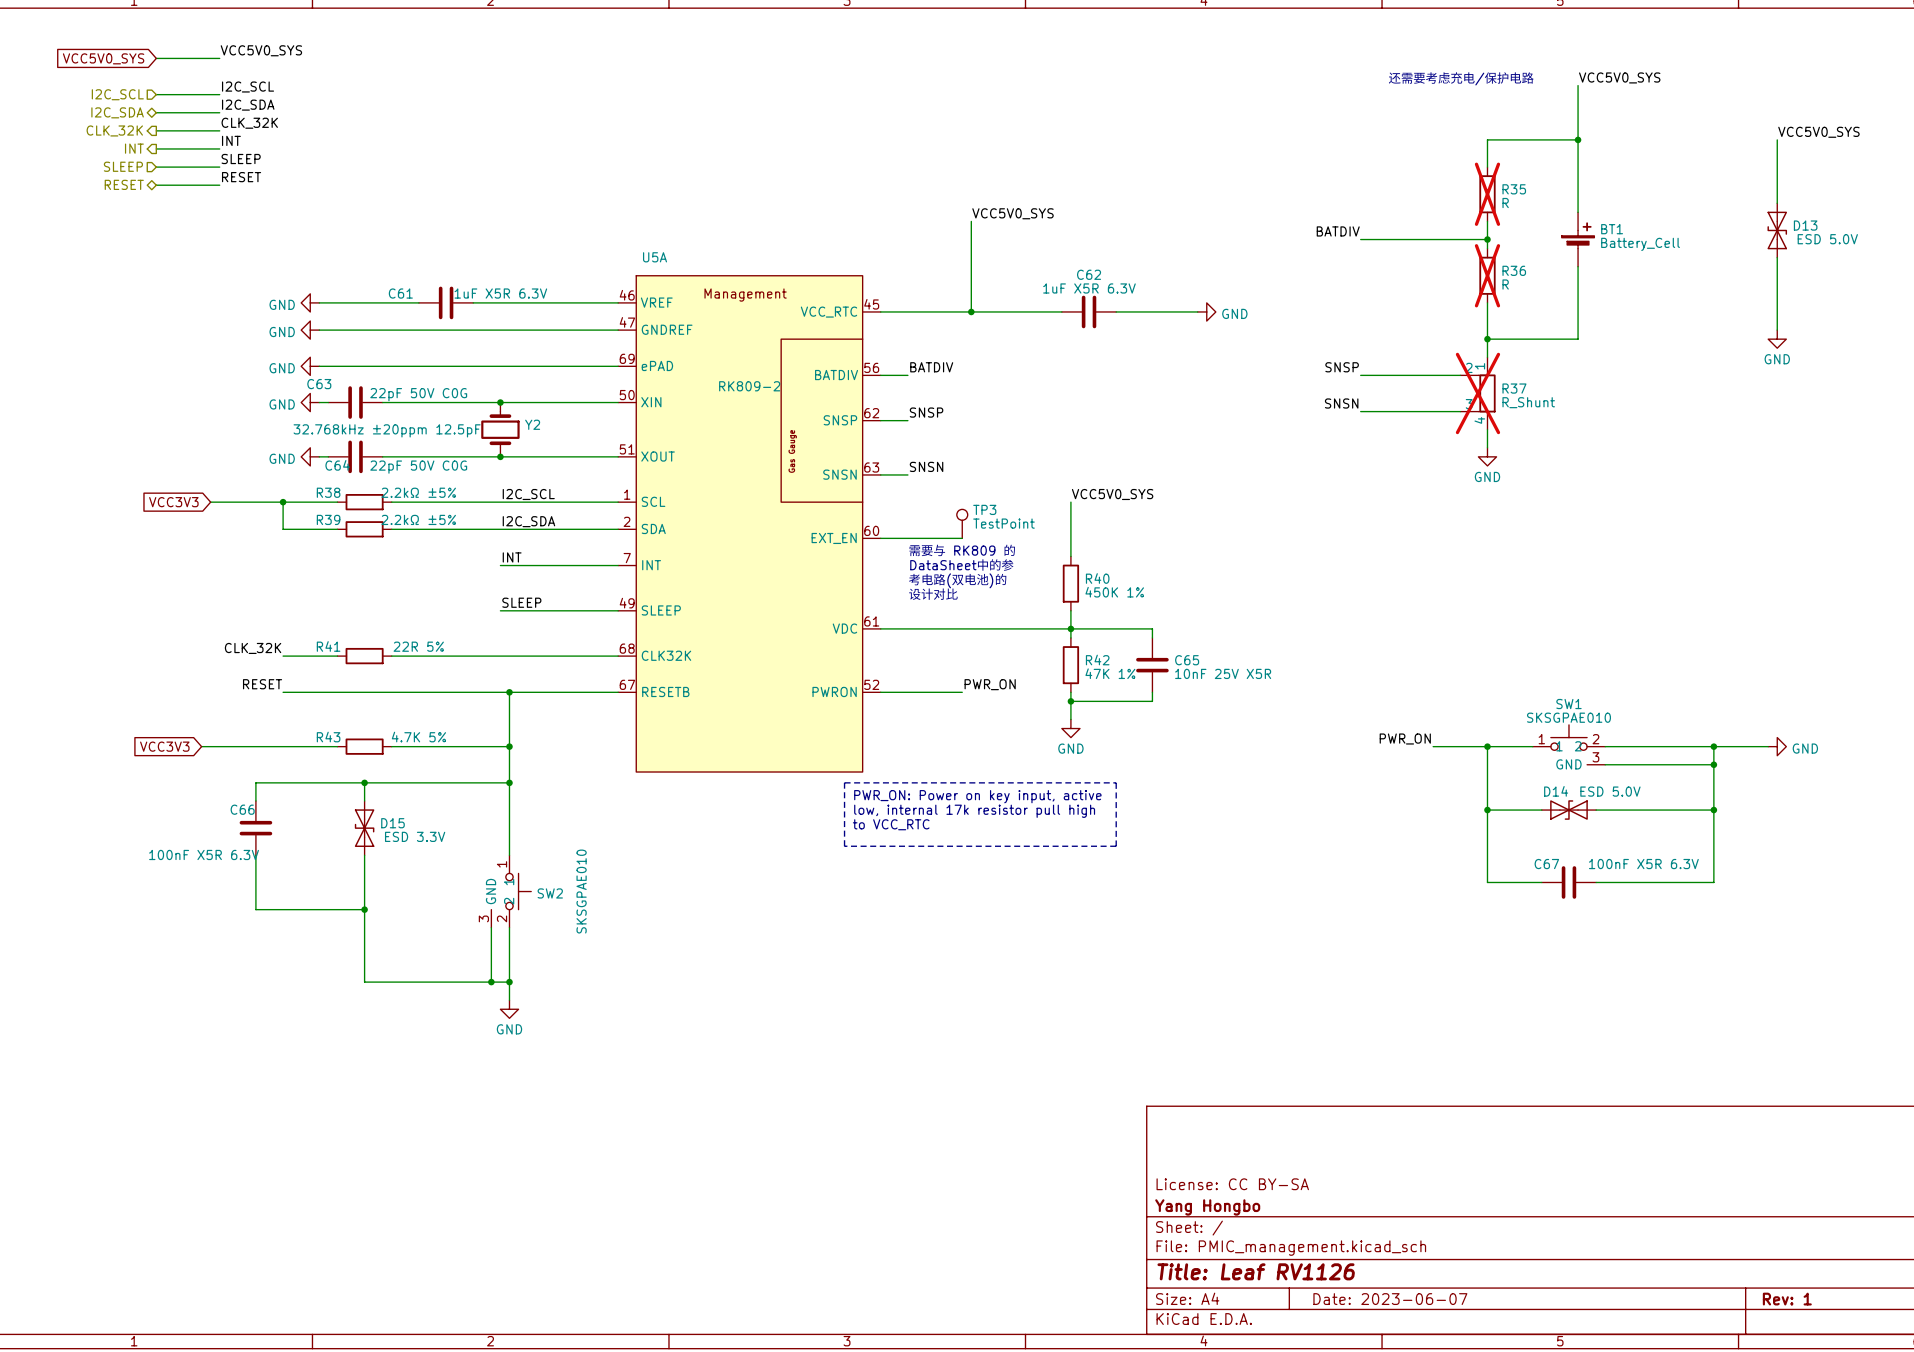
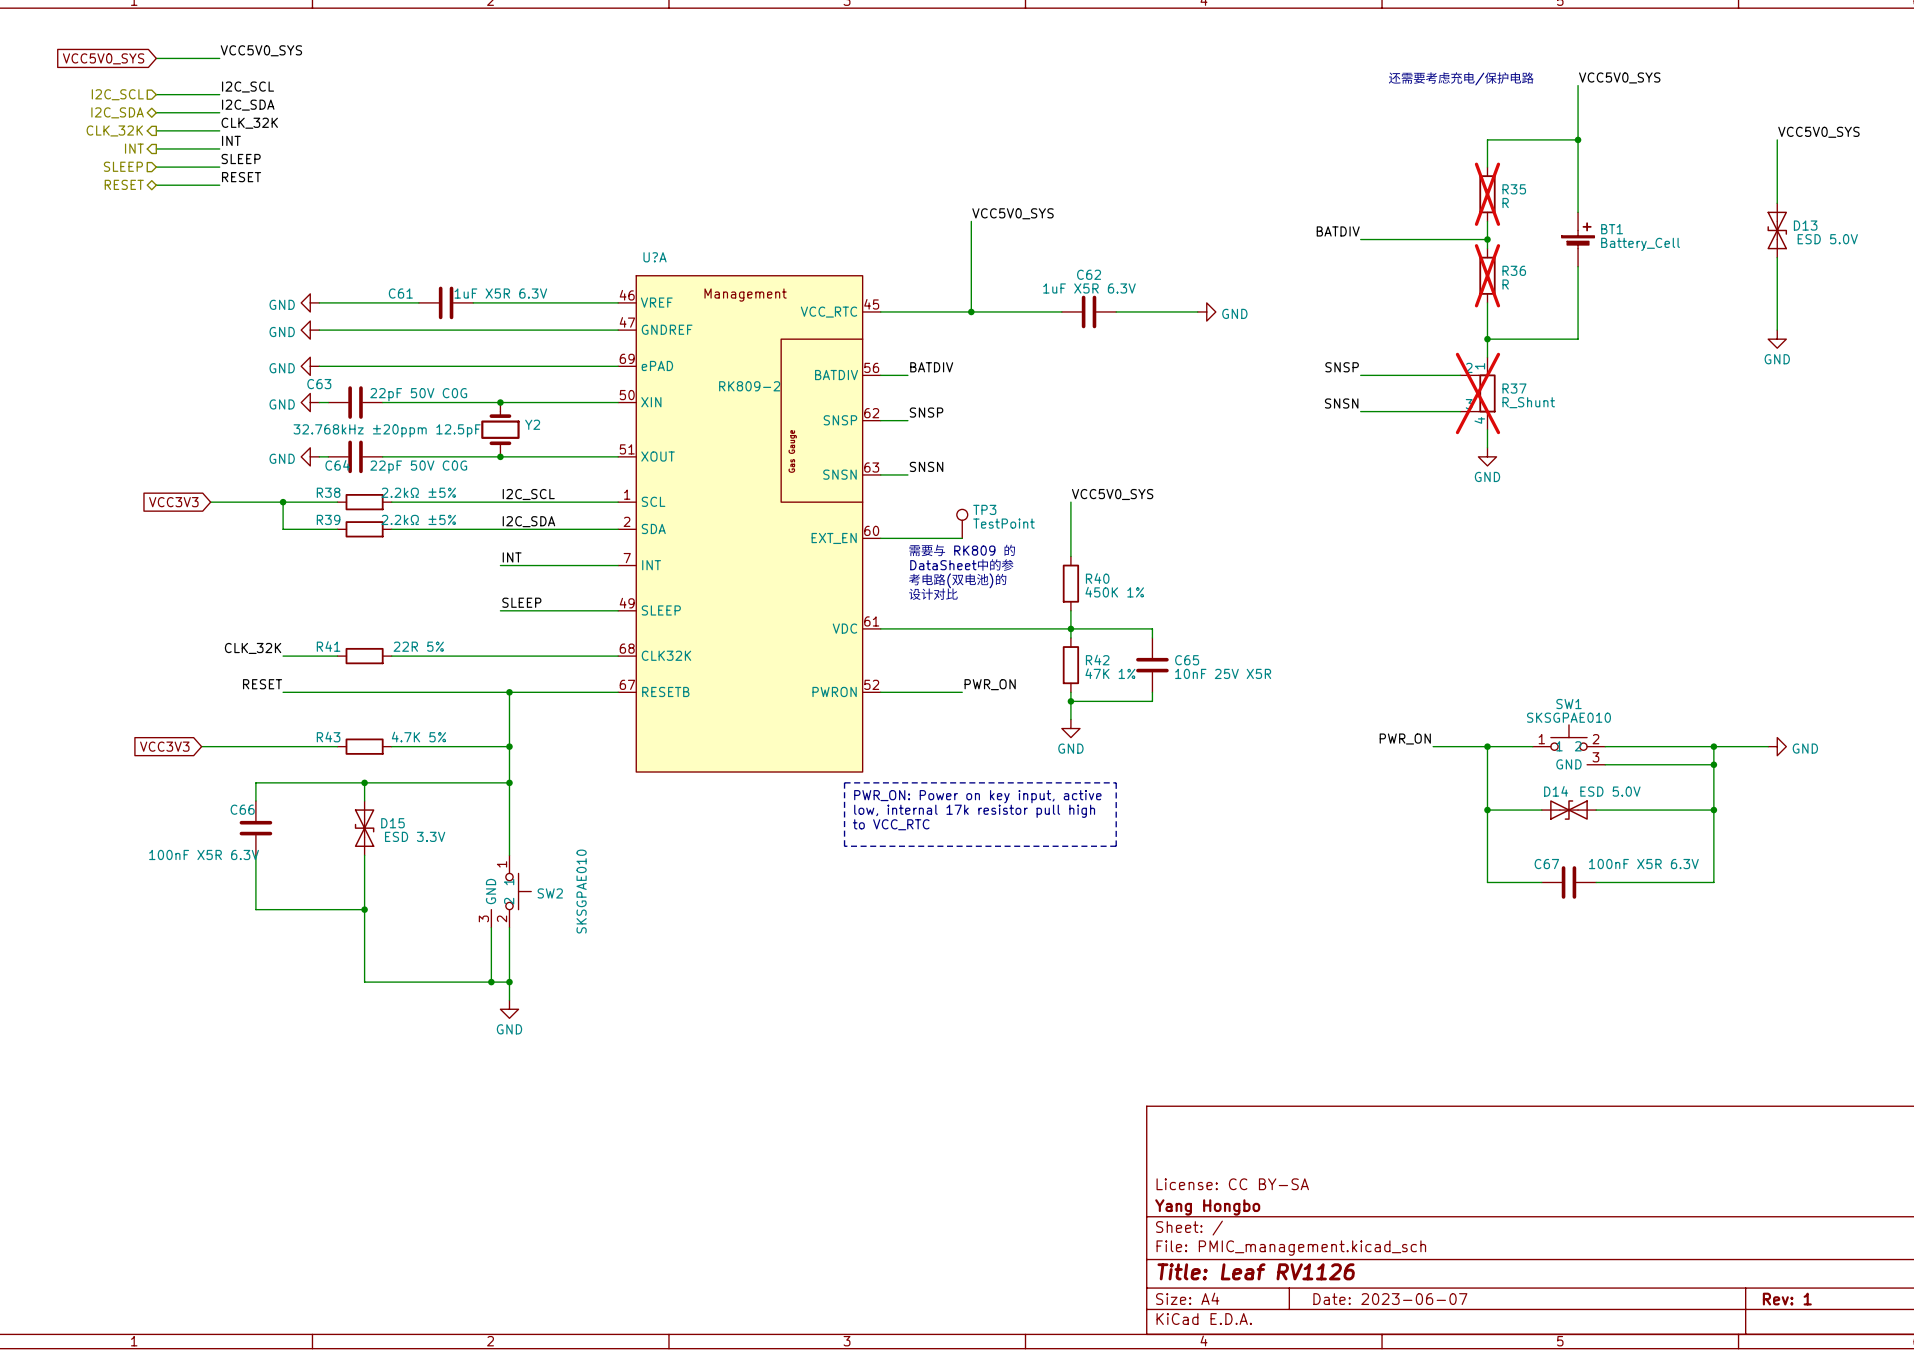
U5A name: U5A (655, 257) -> U?A (655, 257)

